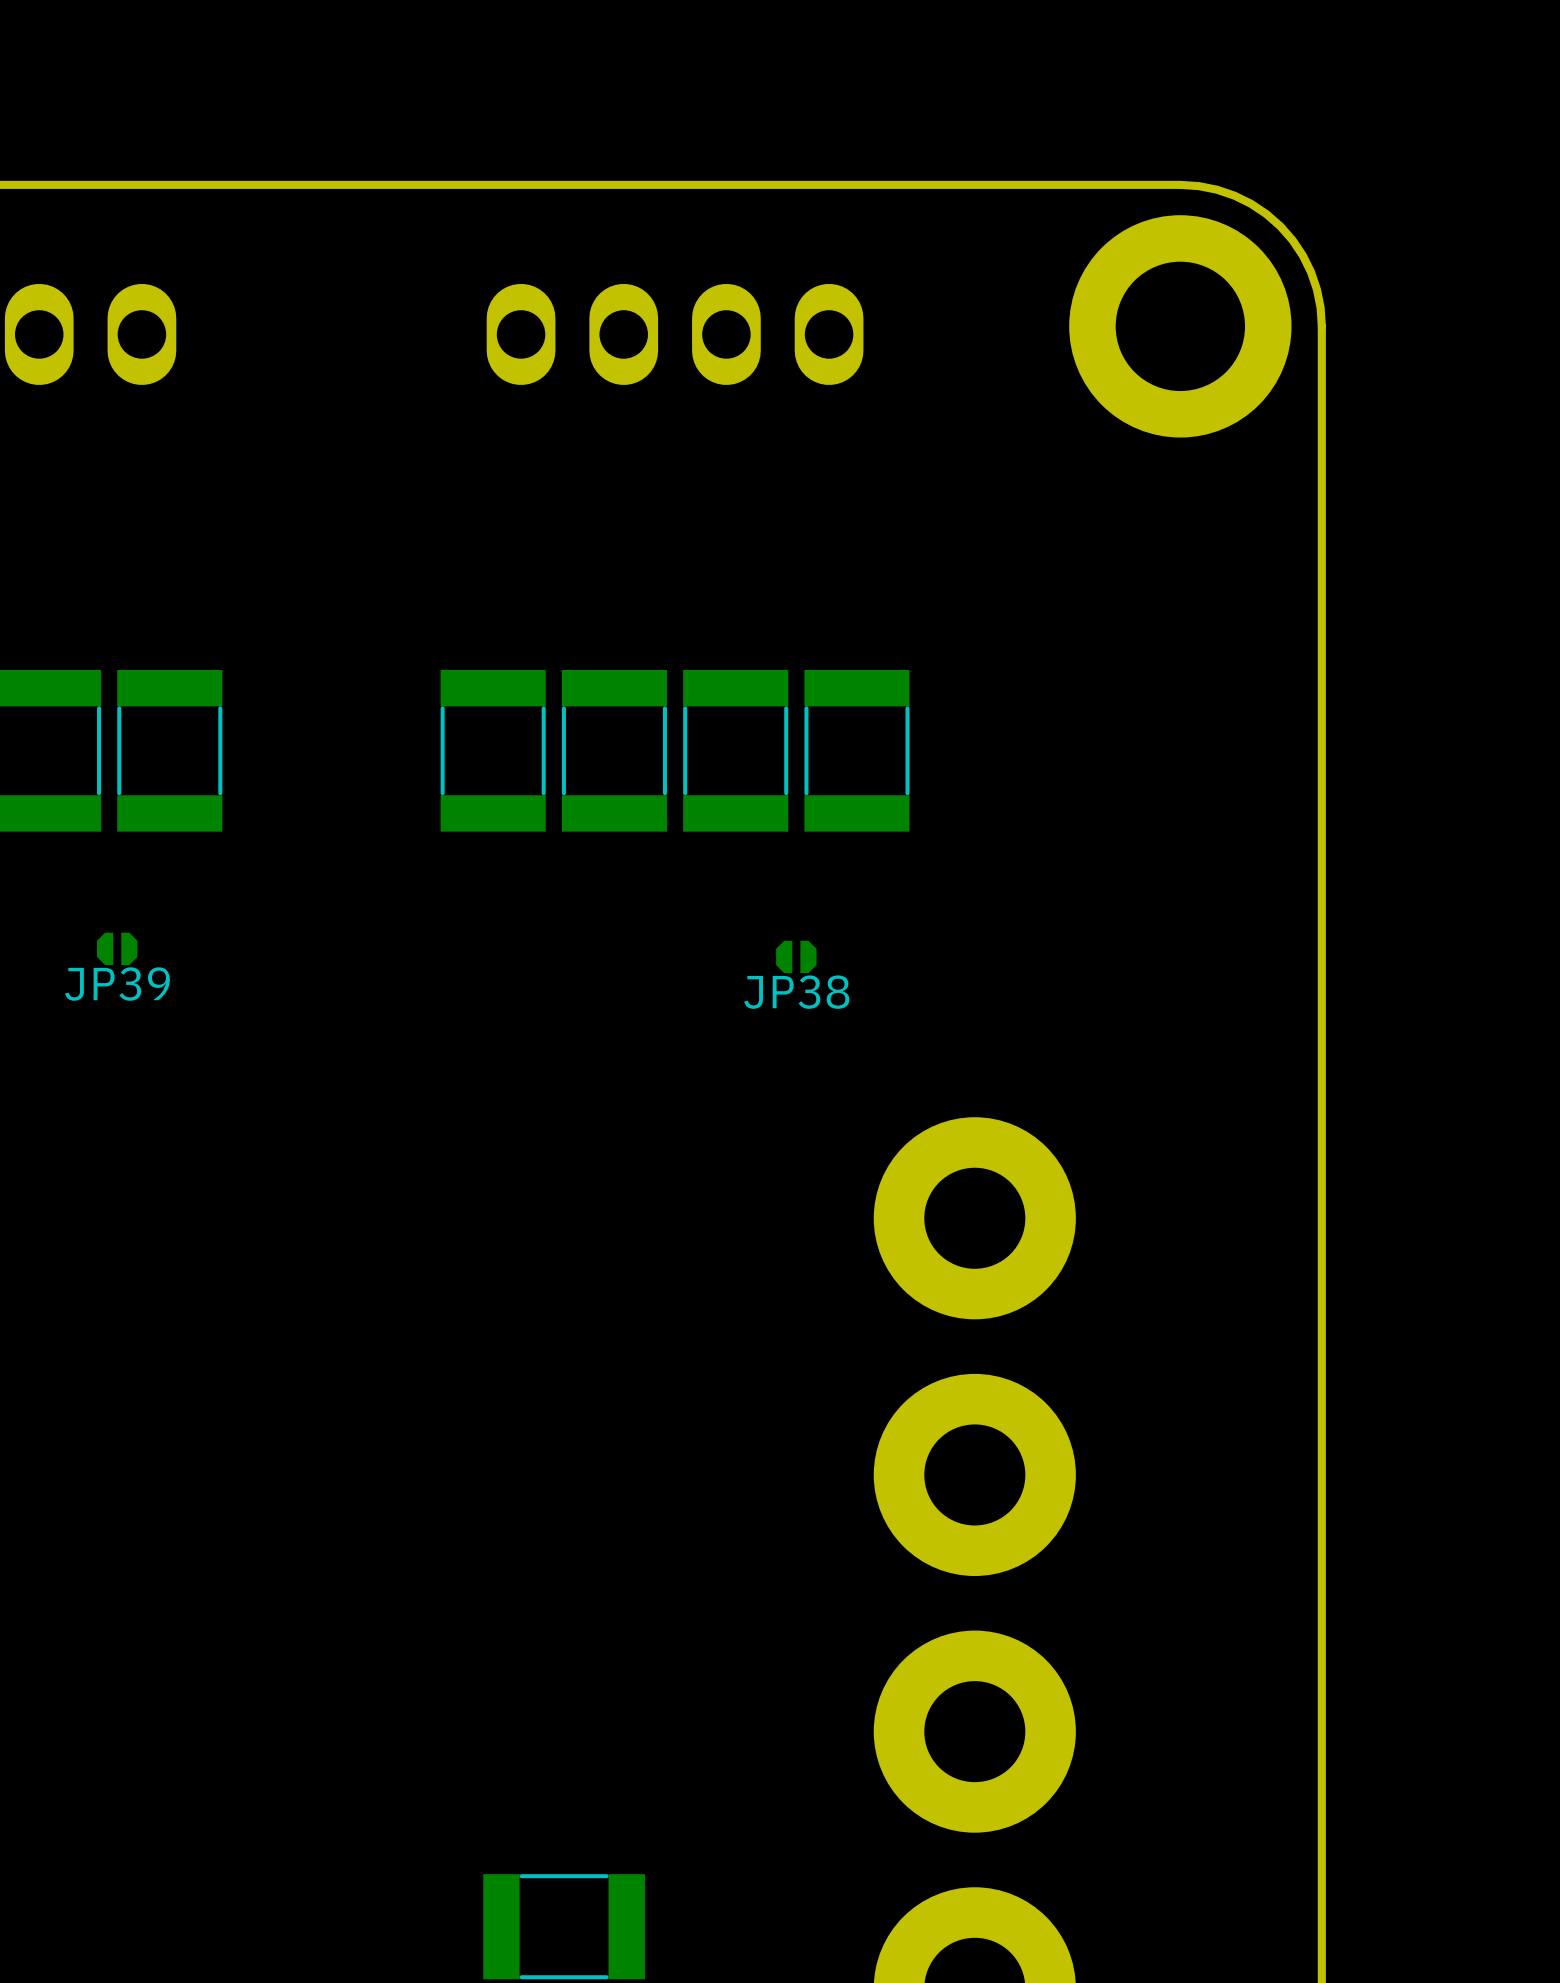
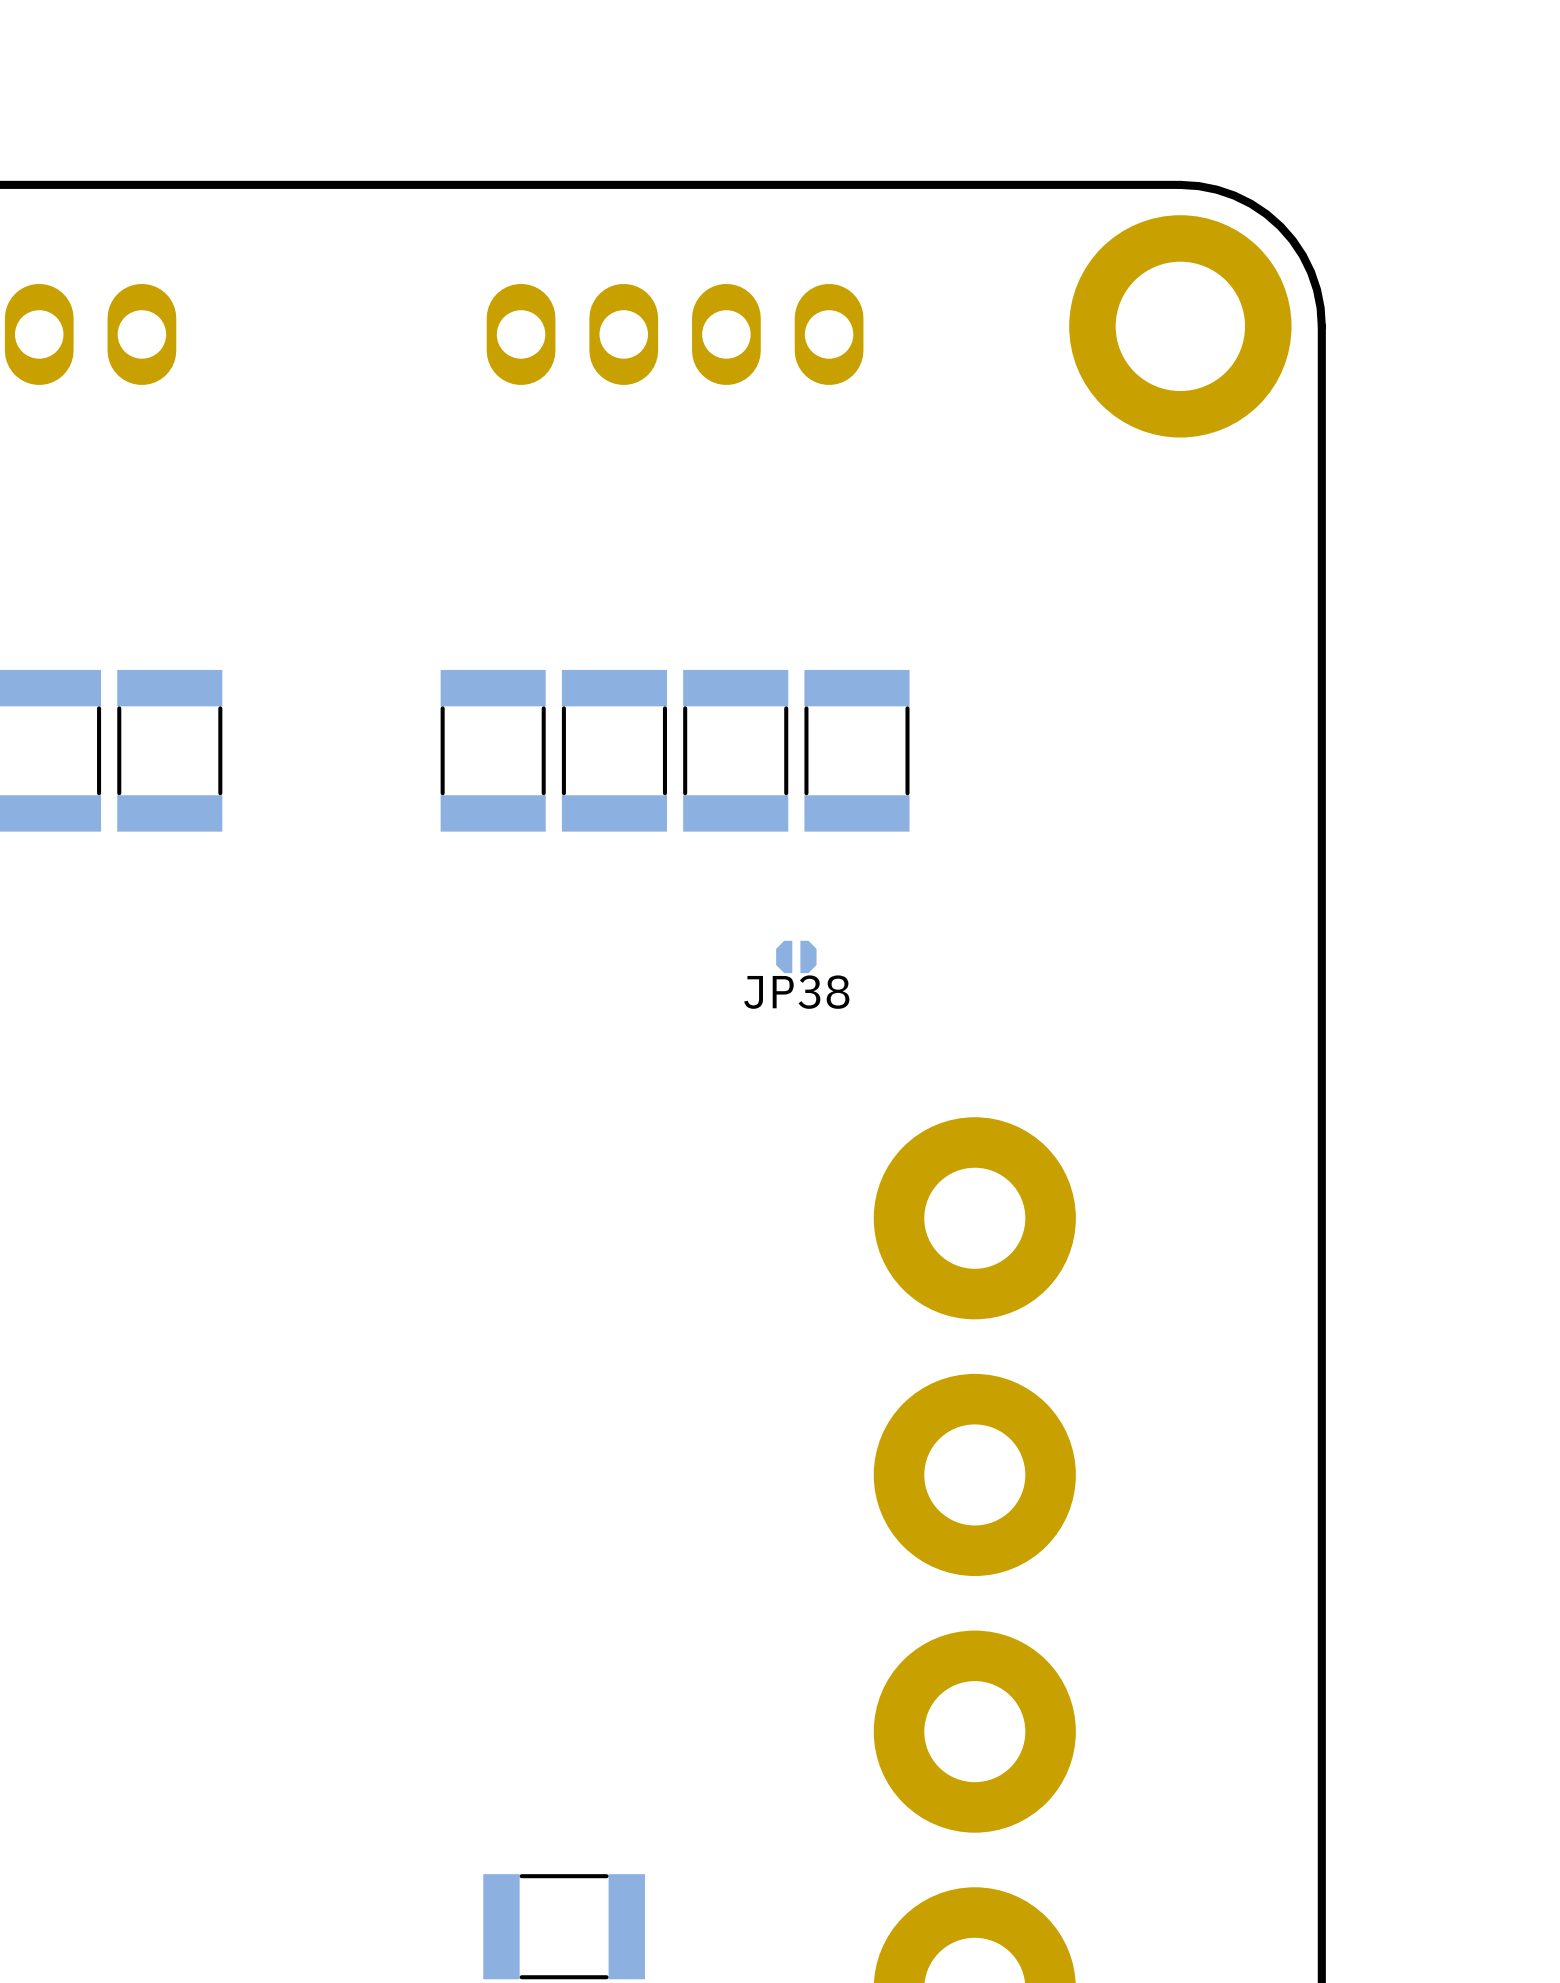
JP39: (117, 948) -> none

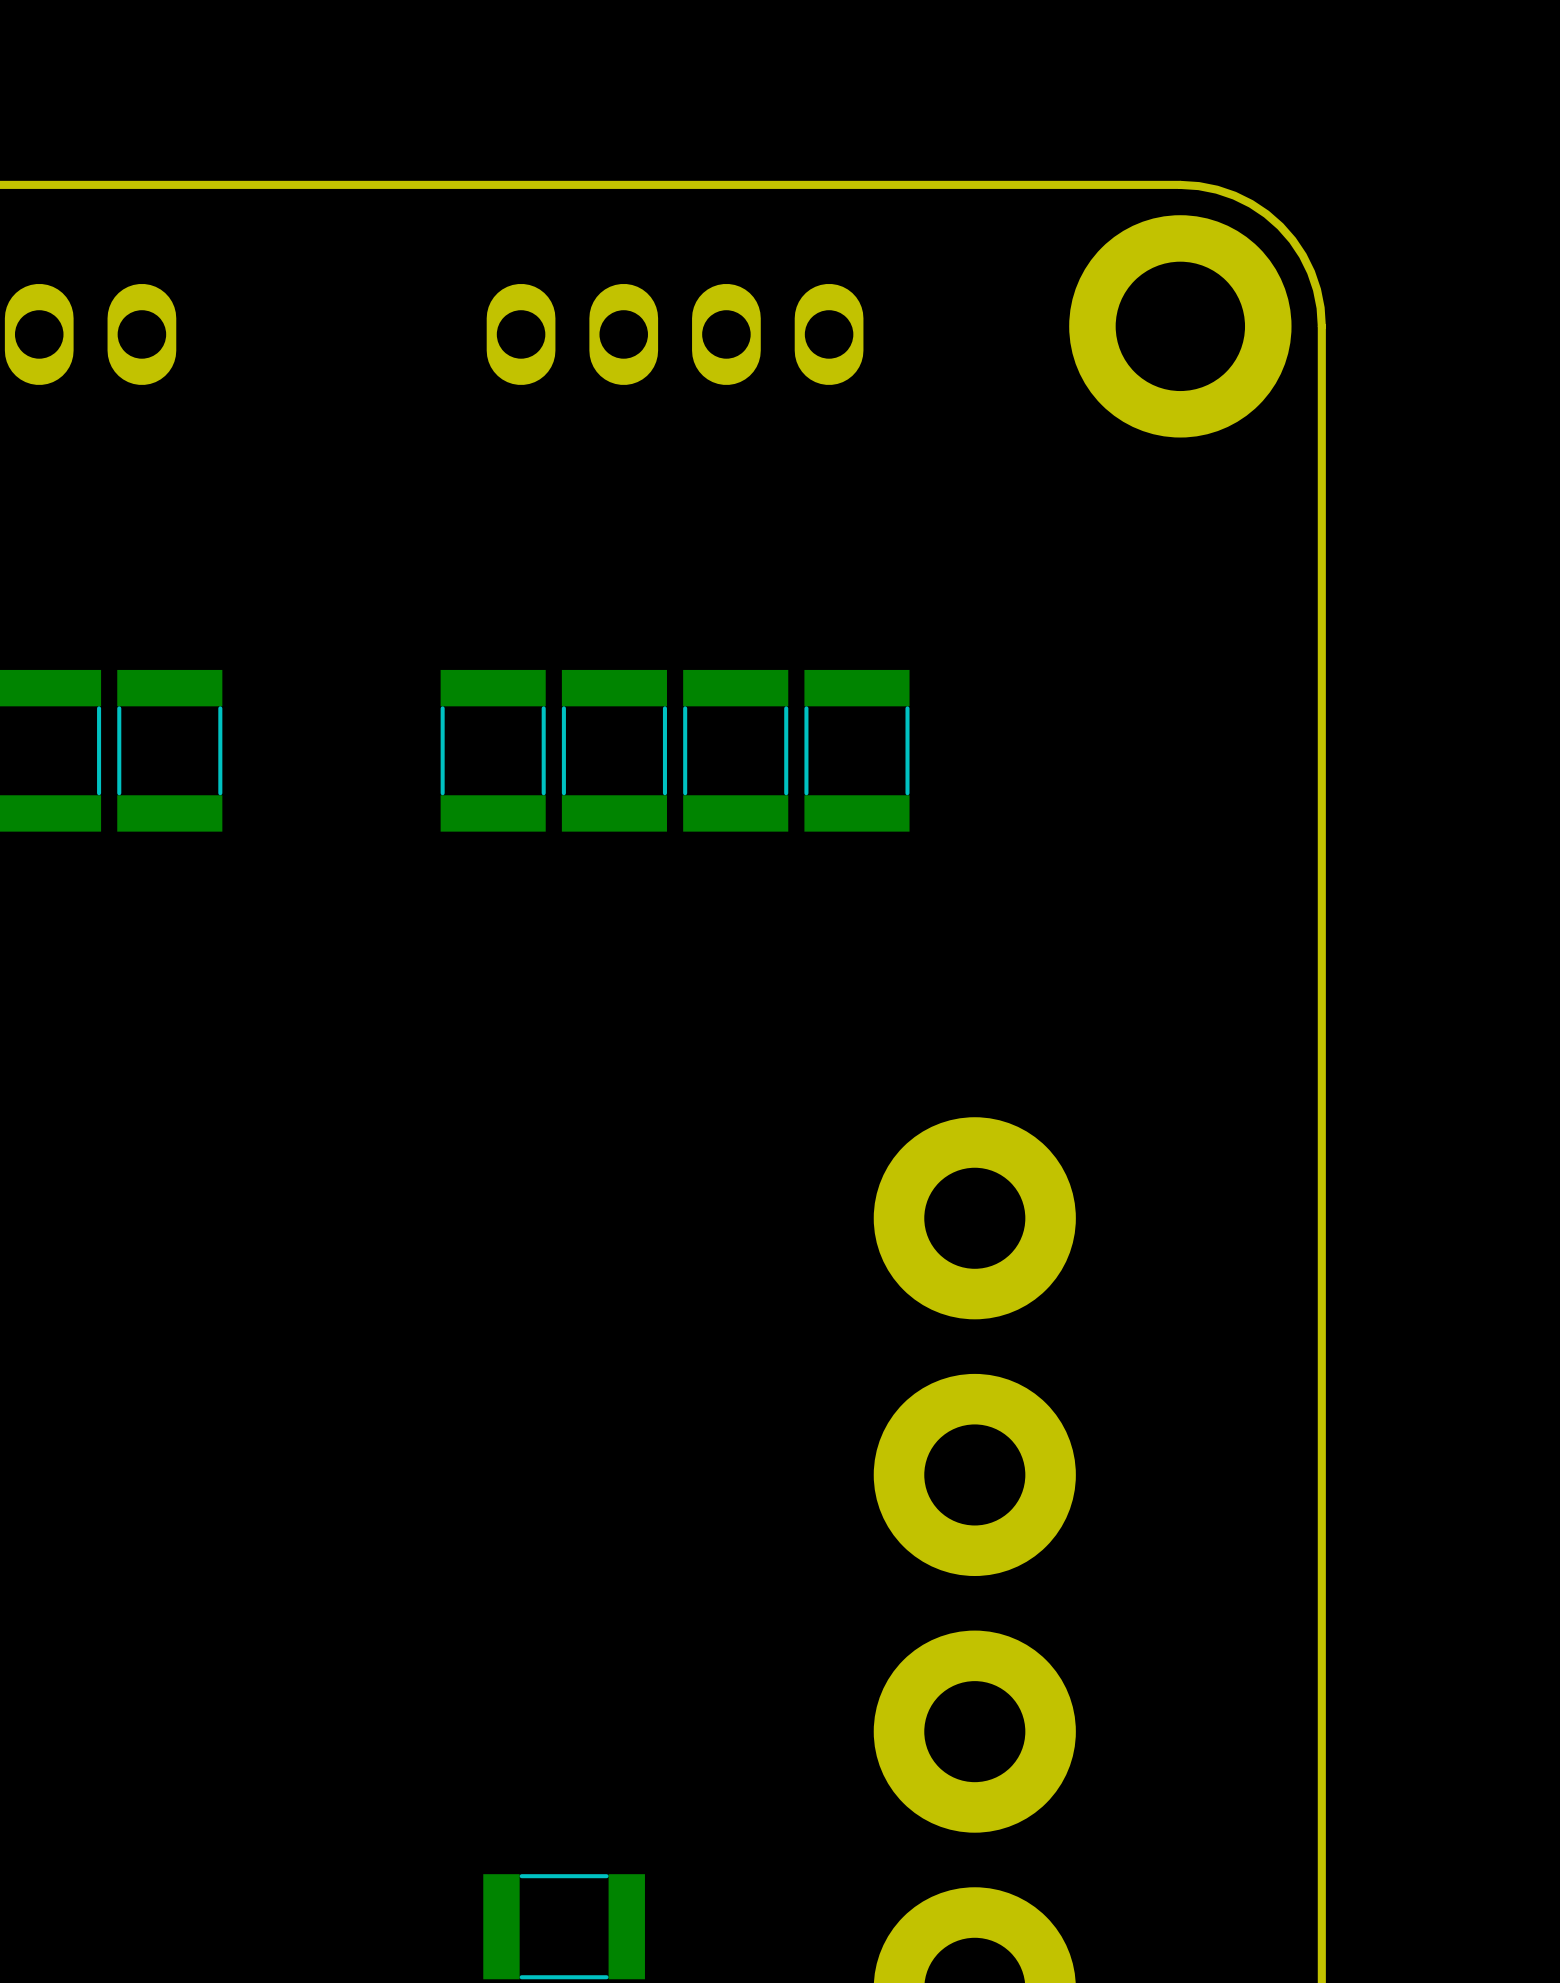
JP38: (796, 956) -> none

